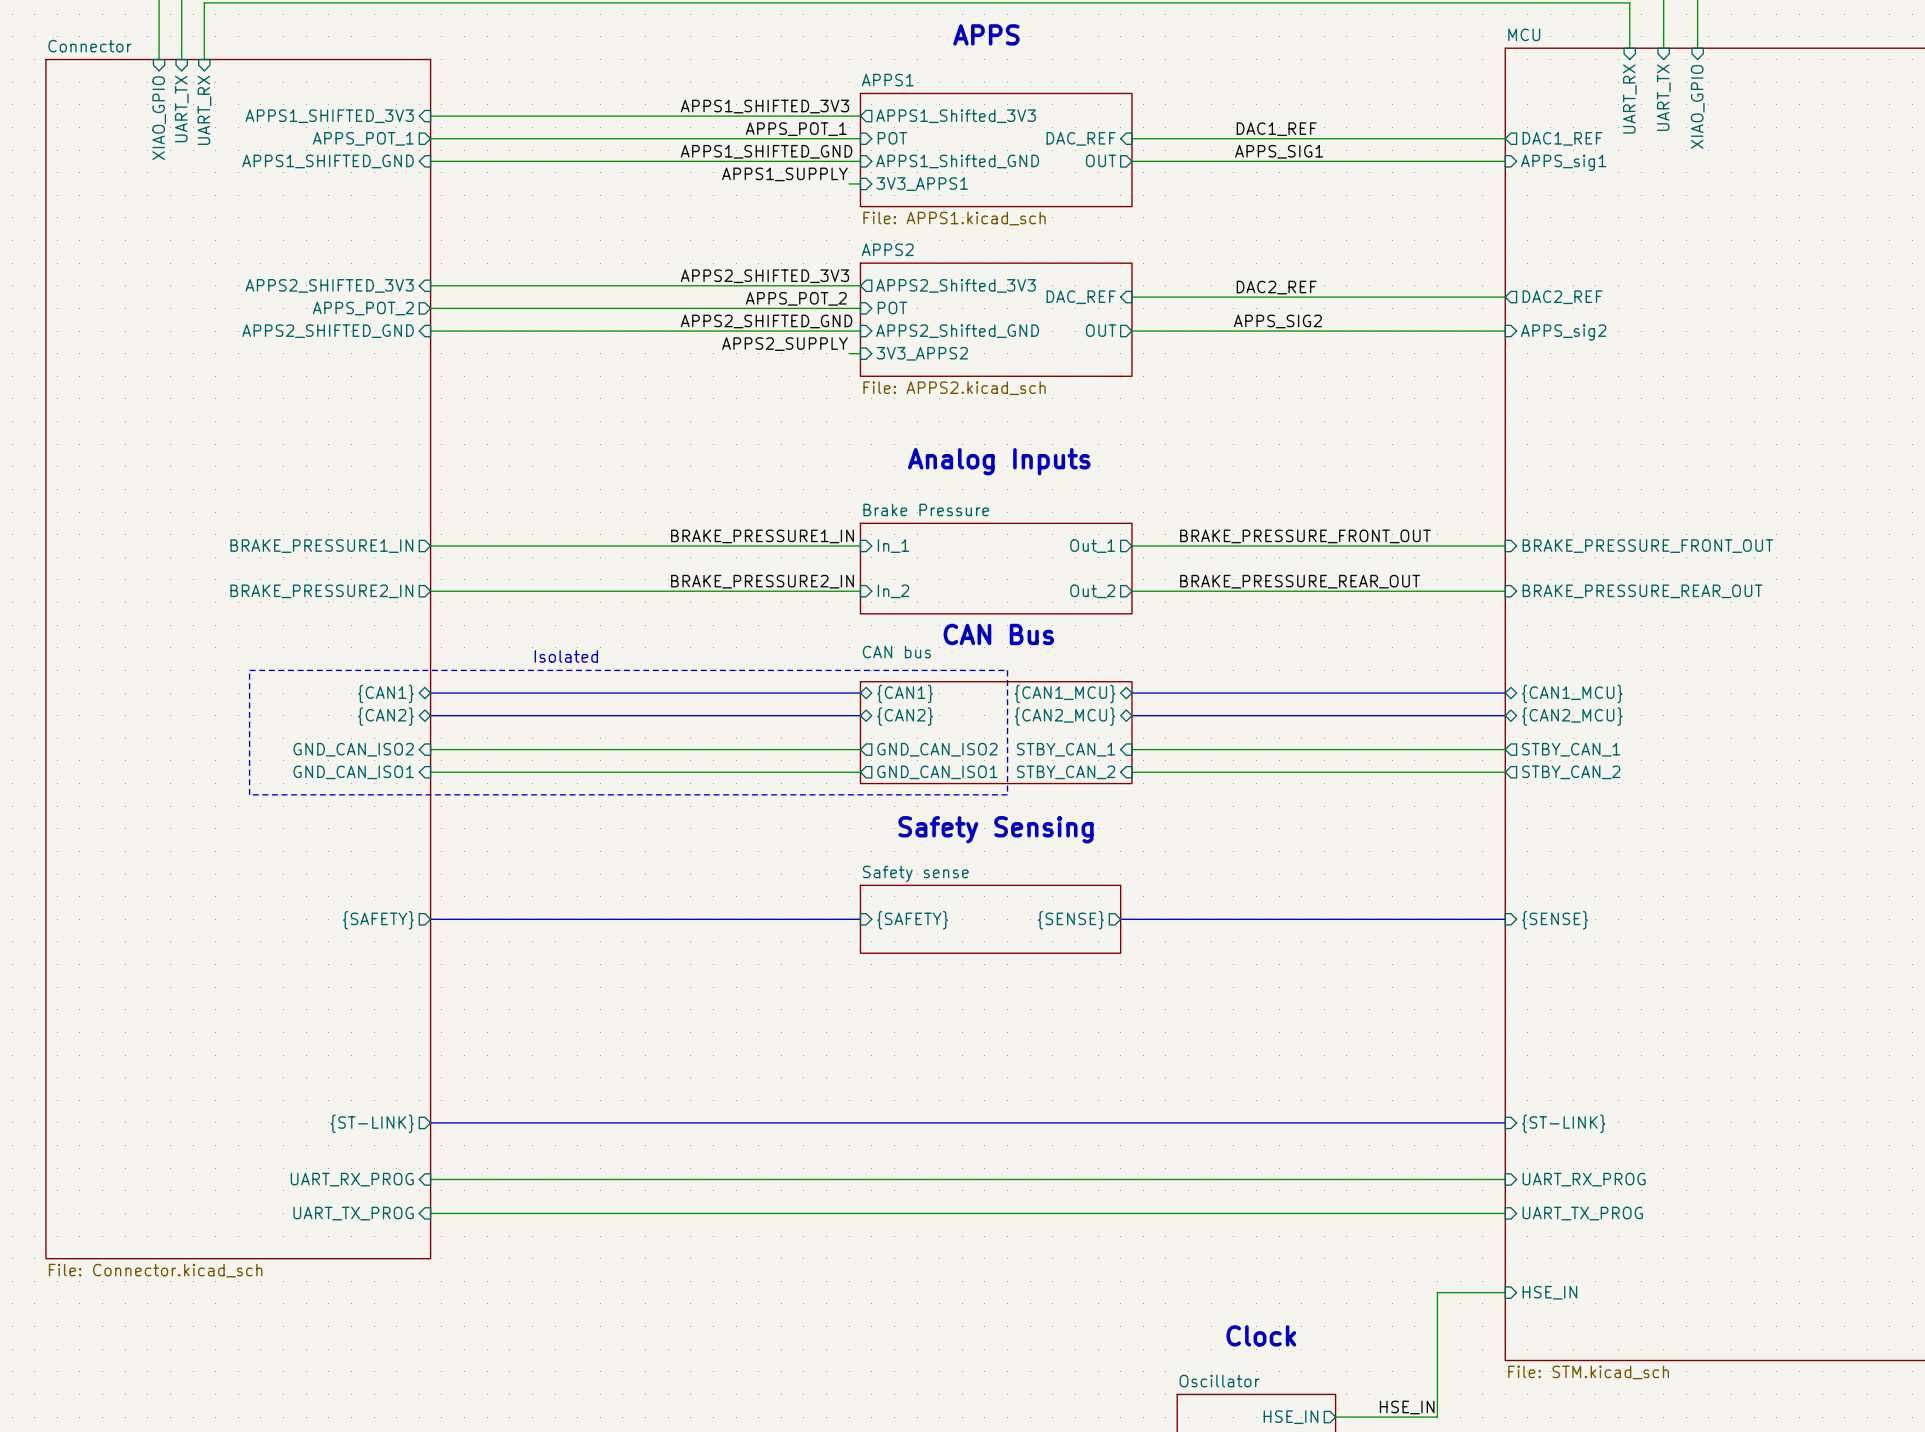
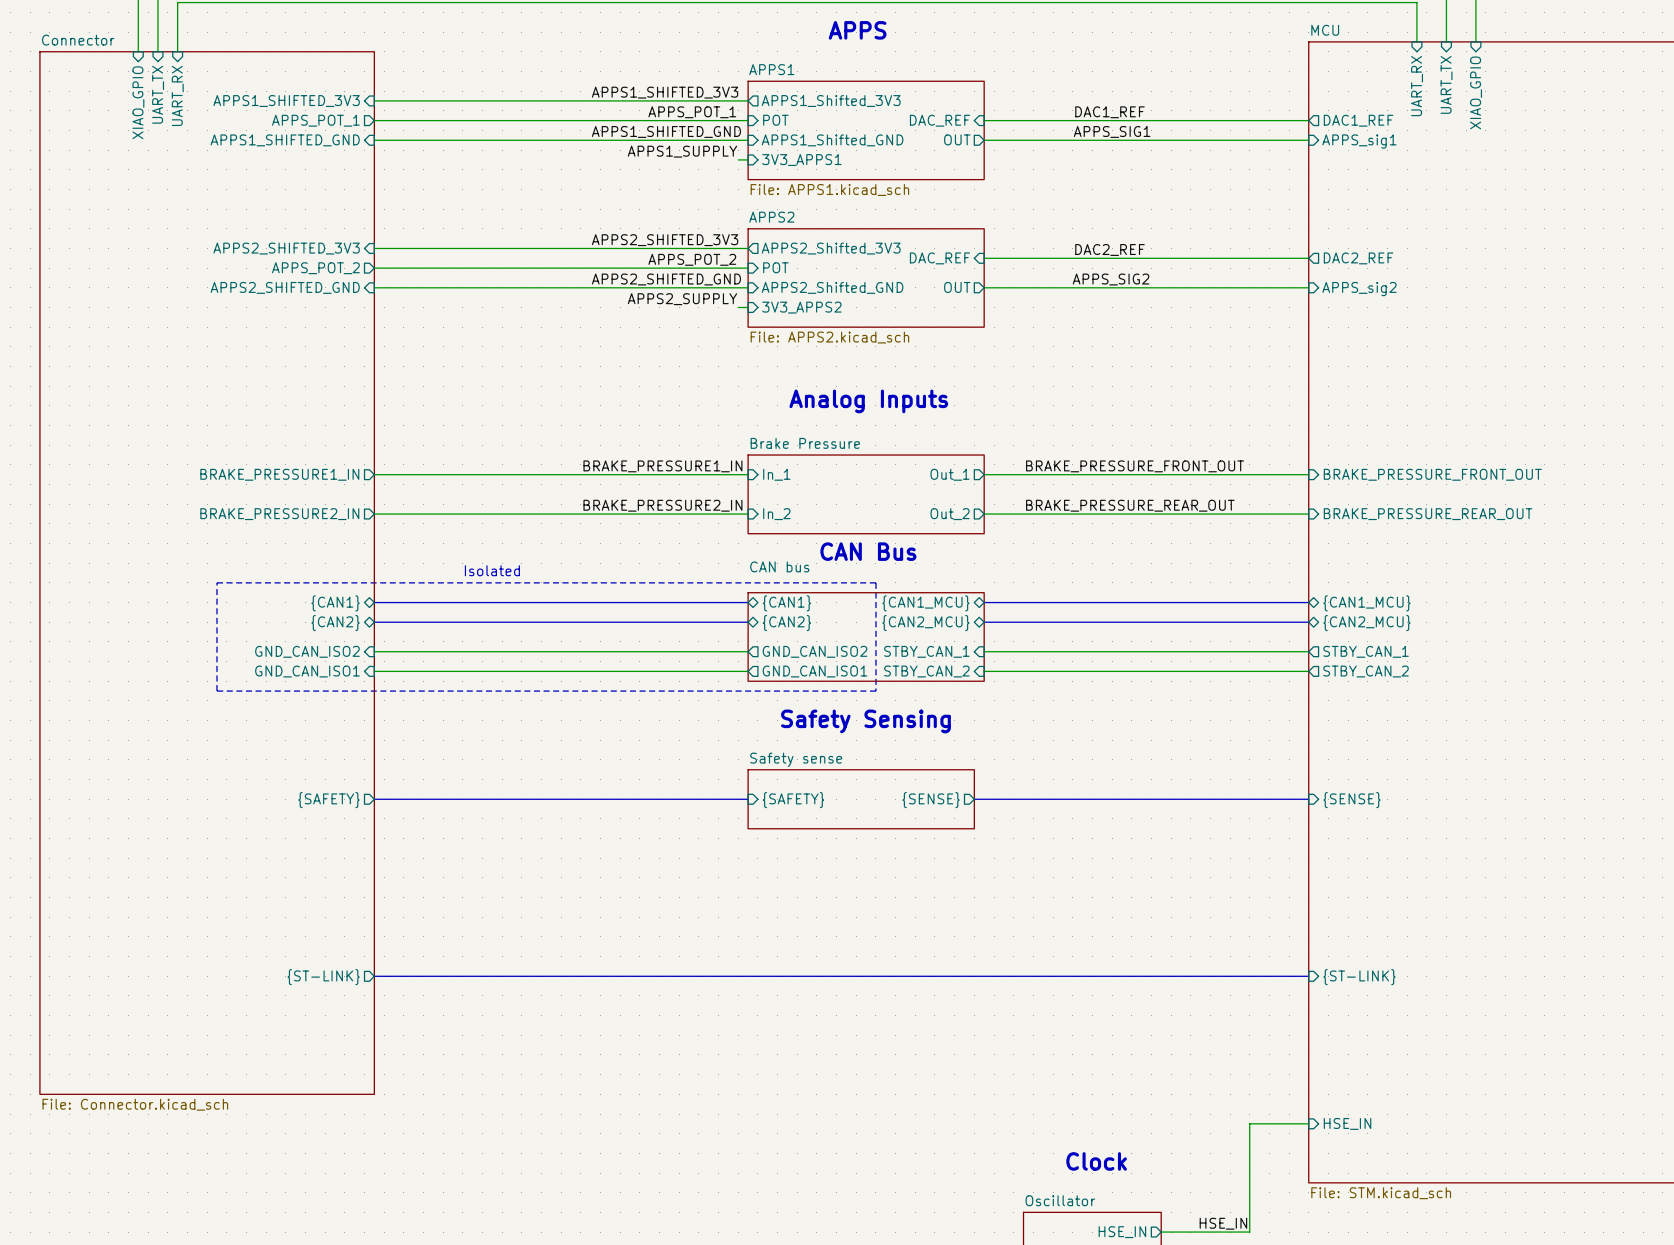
sheet pin: UART_RX_PROG (352, 1179) -> none
wire: (430, 1179) (1505, 1179) -> none
sheet pin: UART_RX_PROG (1584, 1179) -> none
sheet pin: UART_TX_PROG (353, 1213) -> none
wire: (430, 1213) (1505, 1213) -> none
sheet pin: UART_TX_PROG (1582, 1213) -> none

